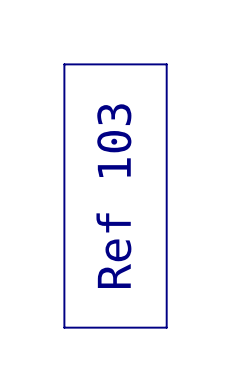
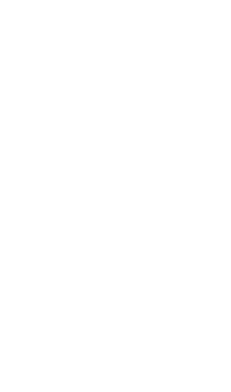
line: (64, 64) (166, 64) (166, 327) (64, 327) (64, 64) -> none
text: Ref 103 (113, 196) -> none

